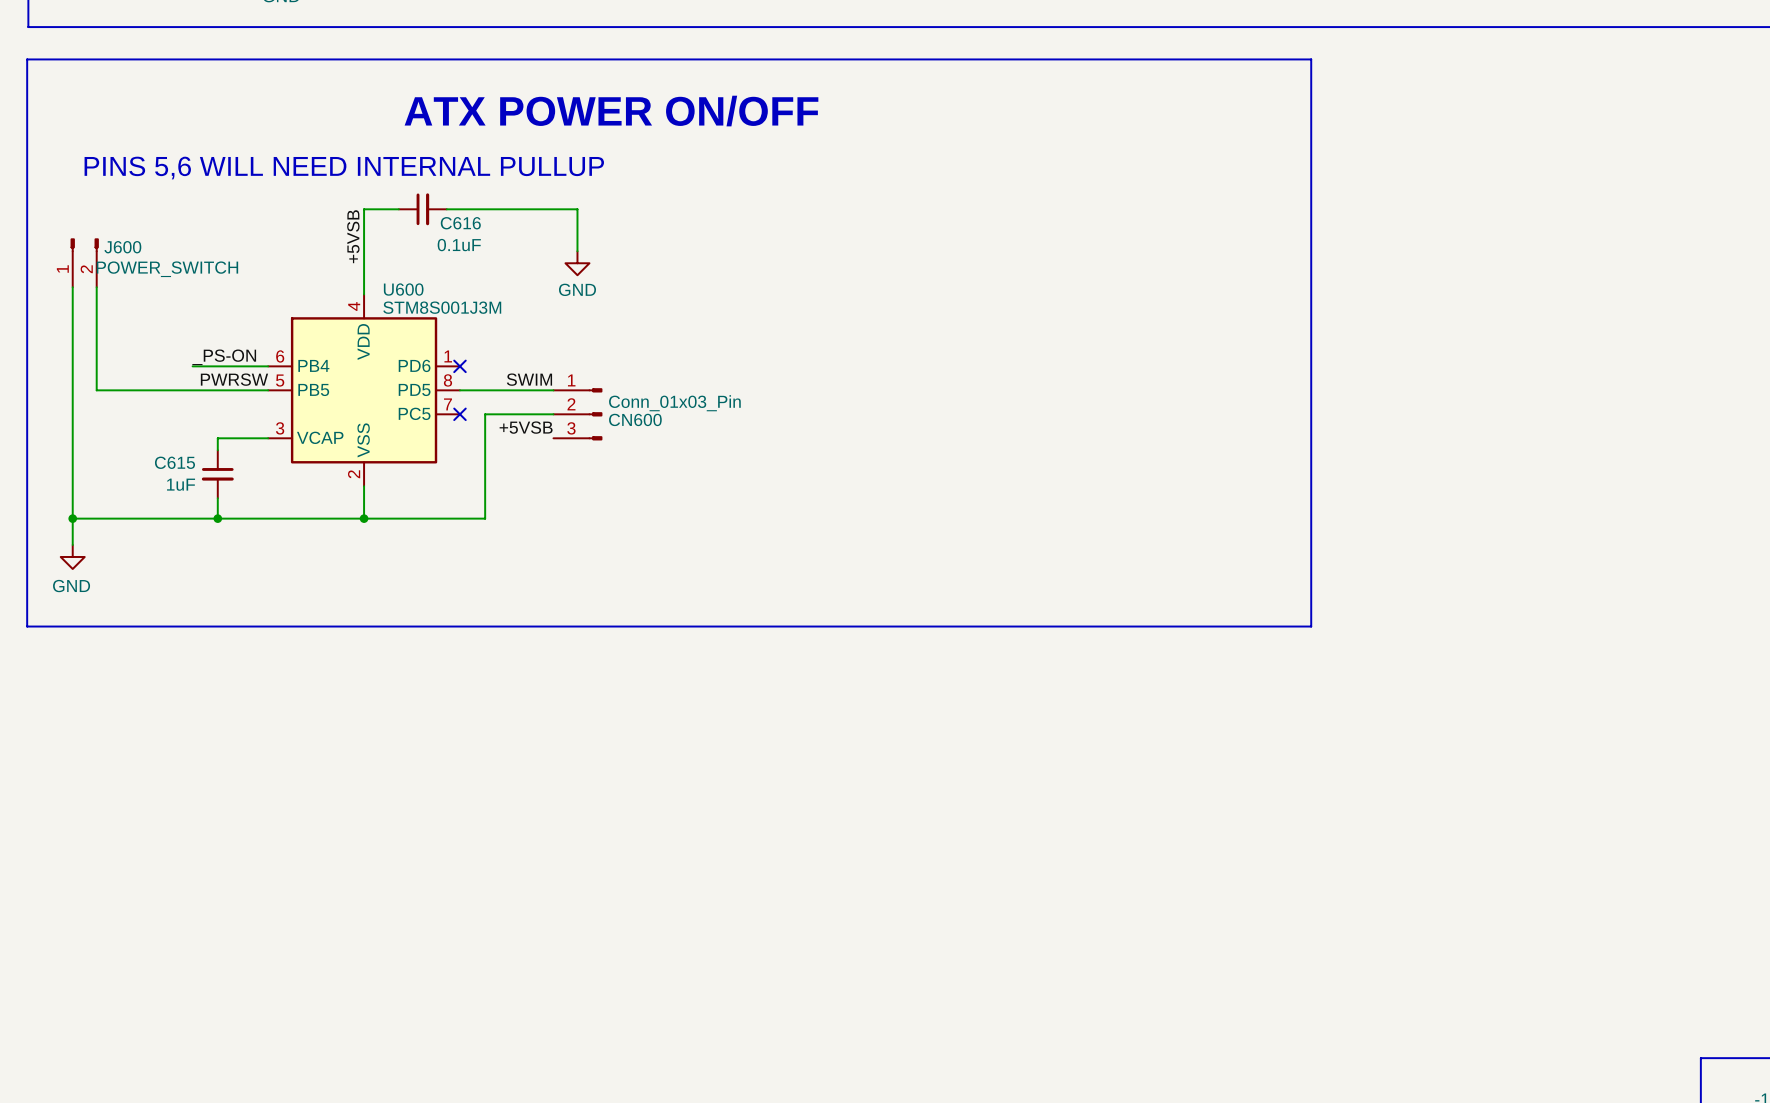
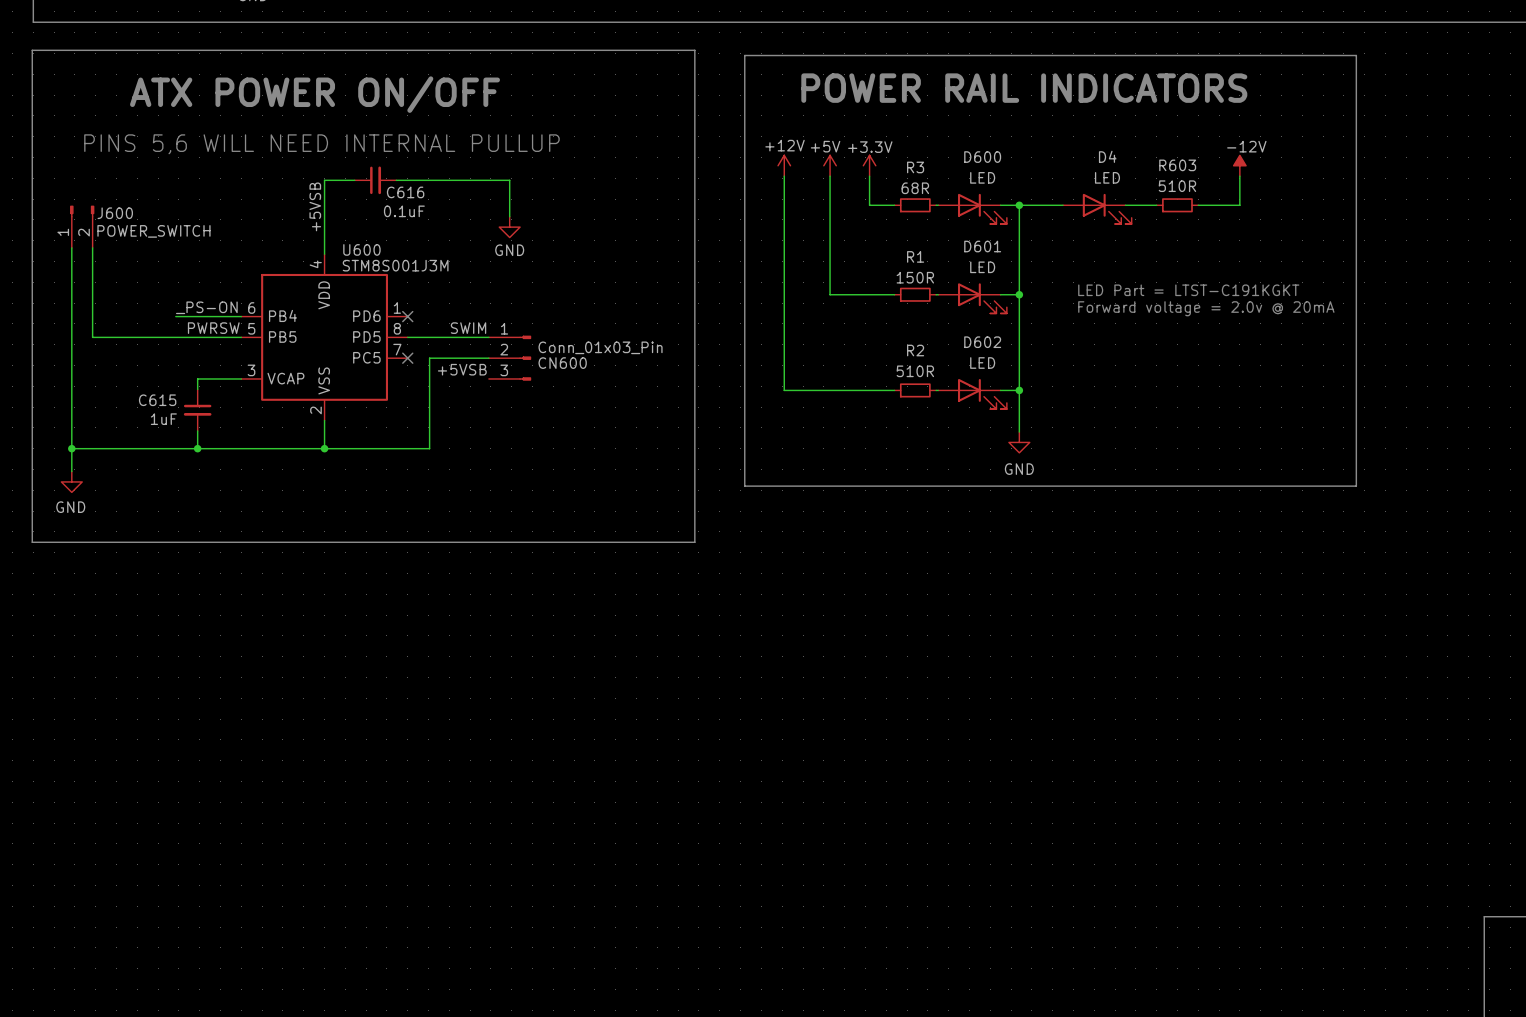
line: (790, 59) (1311, 59) (1311, 626) (790, 626) -> (694, 50) (694, 542)
line: none -> (744, 55) (1356, 55) (1356, 486) (744, 486) (744, 55)
text: none -> POWER RAIL INDICATORS (1024, 88)
text: none -> ATX POWER ON/OFF (315, 94)
text: ATX POWER ON/OFF (611, 111) -> none
power symbol: none -> +12V (784, 165)
power symbol: none -> +5V (830, 165)
power symbol: none -> +3.3V (869, 165)
power symbol: none -> -12V (1239, 165)
wire: none -> (784, 176) (784, 390) (894, 390)
wire: none -> (830, 176) (830, 294) (894, 294)
wire: none -> (869, 176) (869, 205) (894, 205)
wire: none -> (1239, 176) (1239, 205) (1198, 205)
R3: none -> 68R (915, 205)
wire: none -> (936, 205) (938, 205)
wire: none -> (1000, 205) (1063, 205)
wire: none -> (1019, 205) (1019, 432)
junction: none -> (1019, 205)
wire: none -> (1125, 205) (1156, 205)
R603: none -> 510R (1177, 205)
D600: none -> LED (972, 208)
D4: none -> LED (1097, 208)
text: none -> LED Part = LTST-C191KGKT (1188, 290)
R1: none -> 150R (915, 294)
wire: none -> (936, 294) (938, 294)
wire: none -> (1000, 294) (1019, 294)
junction: none -> (1019, 294)
D601: none -> LED (972, 298)
text: none -> Forward voltage = 2.0v @ 20mA (1206, 308)
R2: none -> 510R (915, 390)
wire: none -> (936, 390) (938, 390)
wire: none -> (1000, 390) (1019, 390)
junction: none -> (1019, 390)
D602: none -> LED (972, 394)
power symbol: none -> GND (1019, 442)

